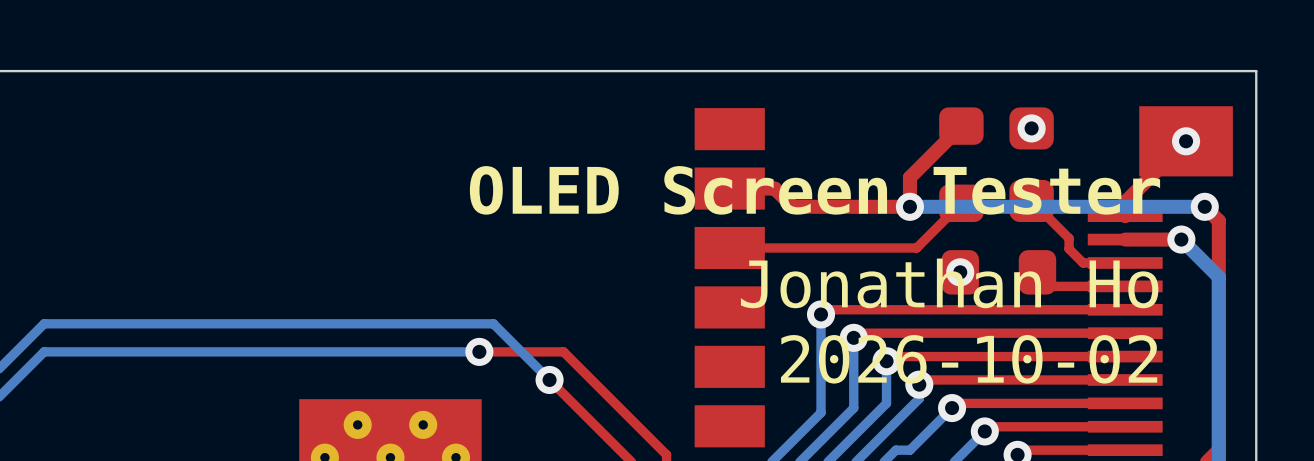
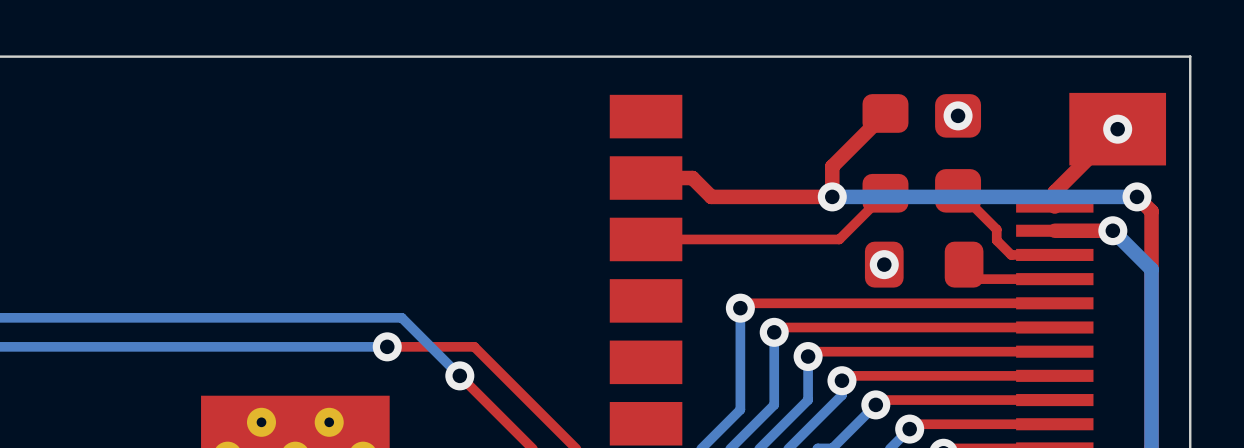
text: OLED Screen Tester (814, 190) -> none
text: Jonathan Ho (949, 283) -> none
text: 2026-10-02 (969, 359) -> none

